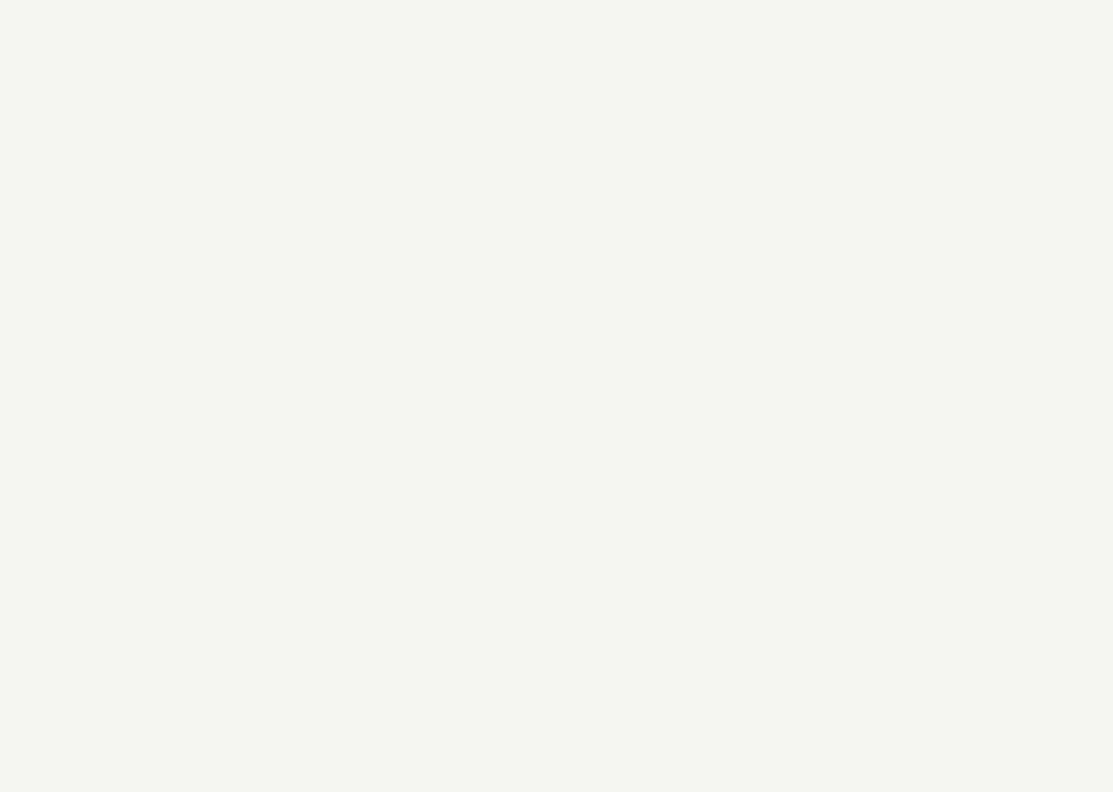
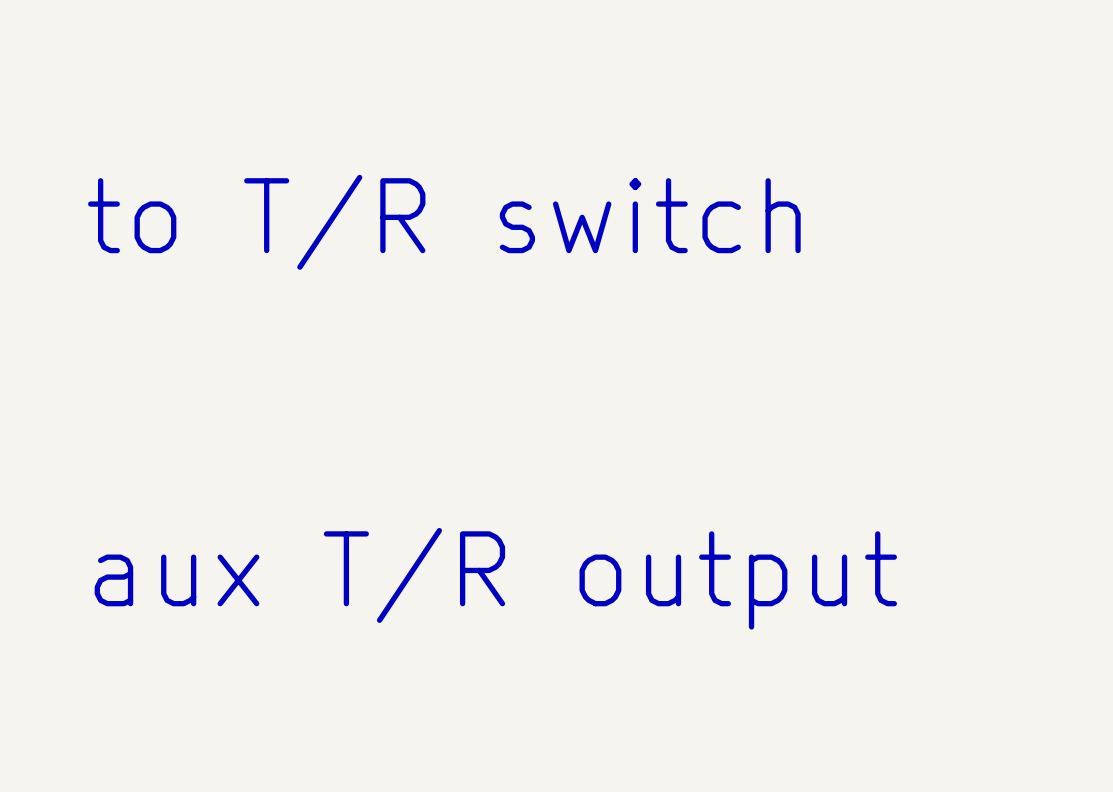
text: none -> to T/R switch (444, 222)
text: none -> aux T/R output (495, 578)

